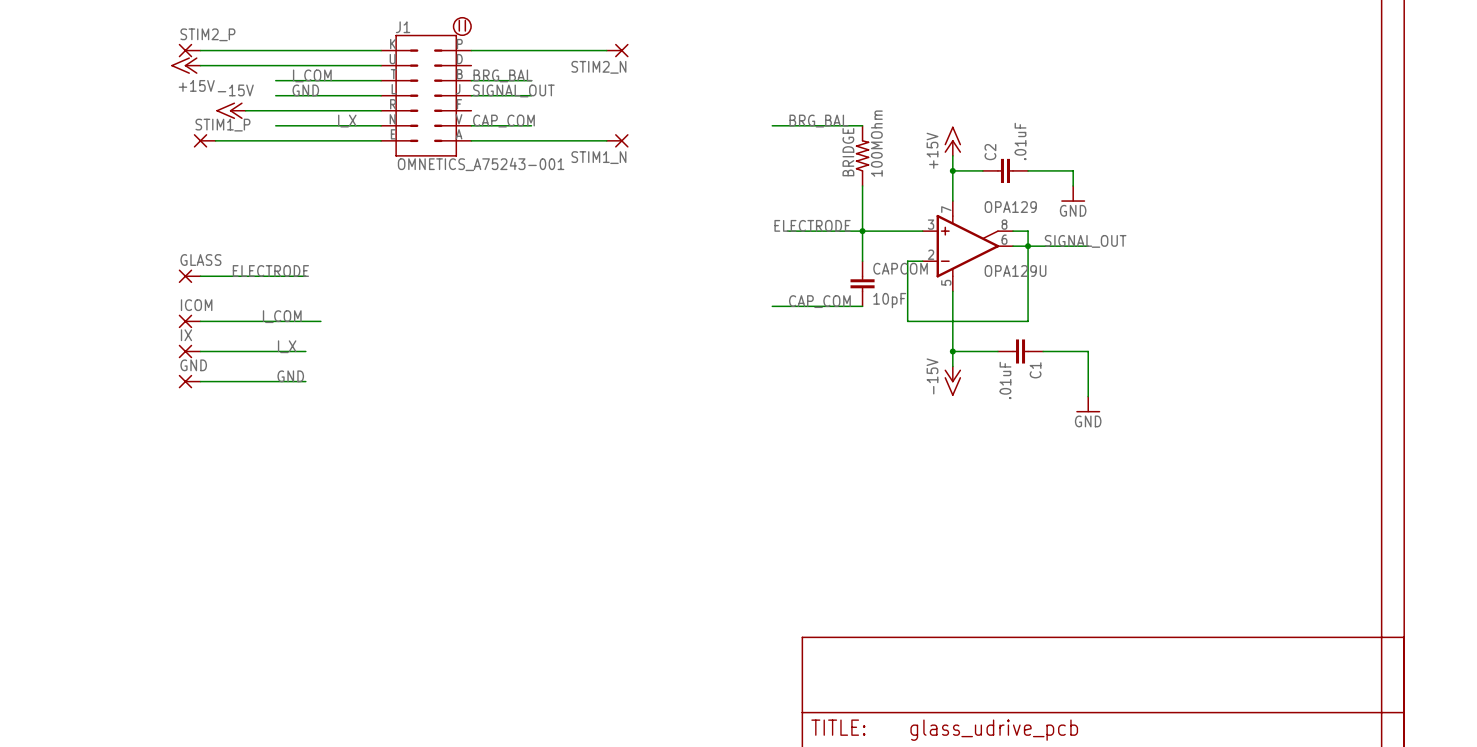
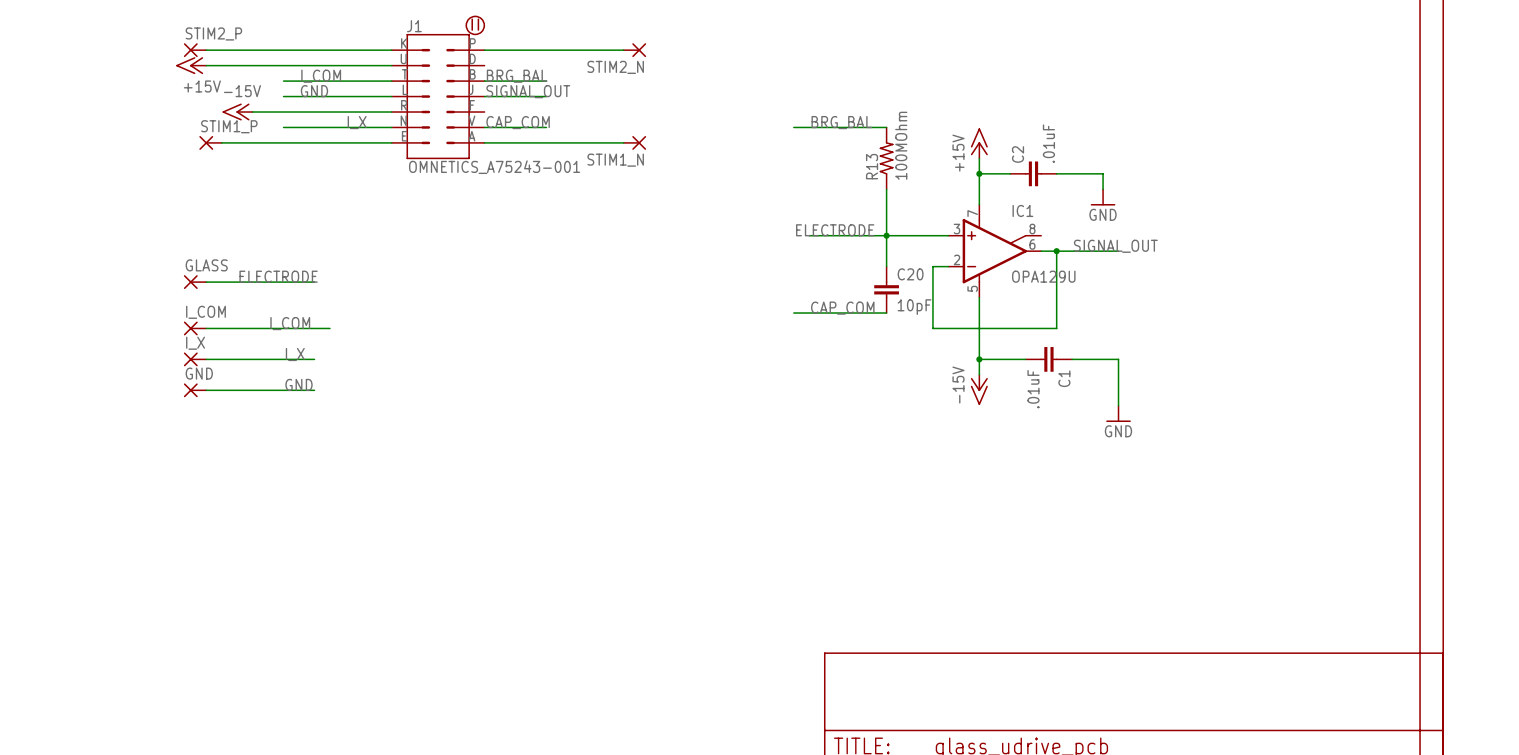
BRIDGE name: BRIDGE (848, 152) -> R13 (872, 166)
OPA129 name: OPA129 (1010, 207) -> IC1 (1022, 210)
wire: (1013, 231) (1028, 231) (1028, 246) -> none
CAPCOM name: CAPCOM (900, 268) -> C20 (910, 274)
ICOM name: ICOM (196, 305) -> I_COM (205, 312)
IX name: IX (186, 335) -> I_X (195, 343)

